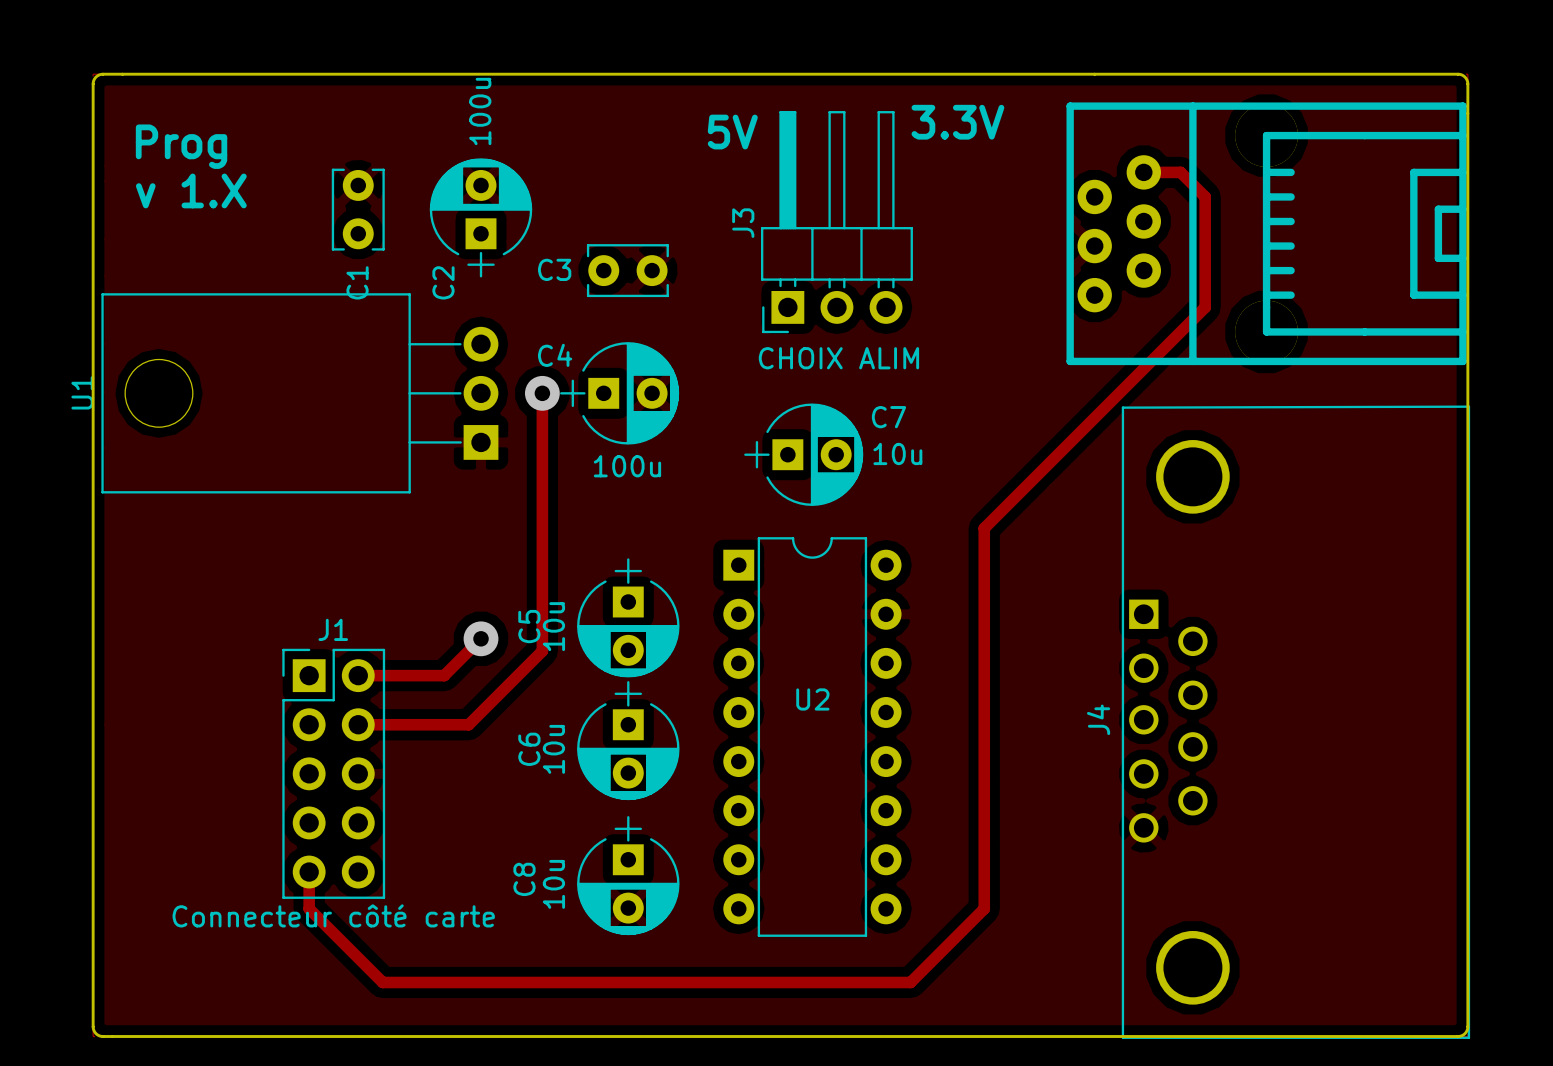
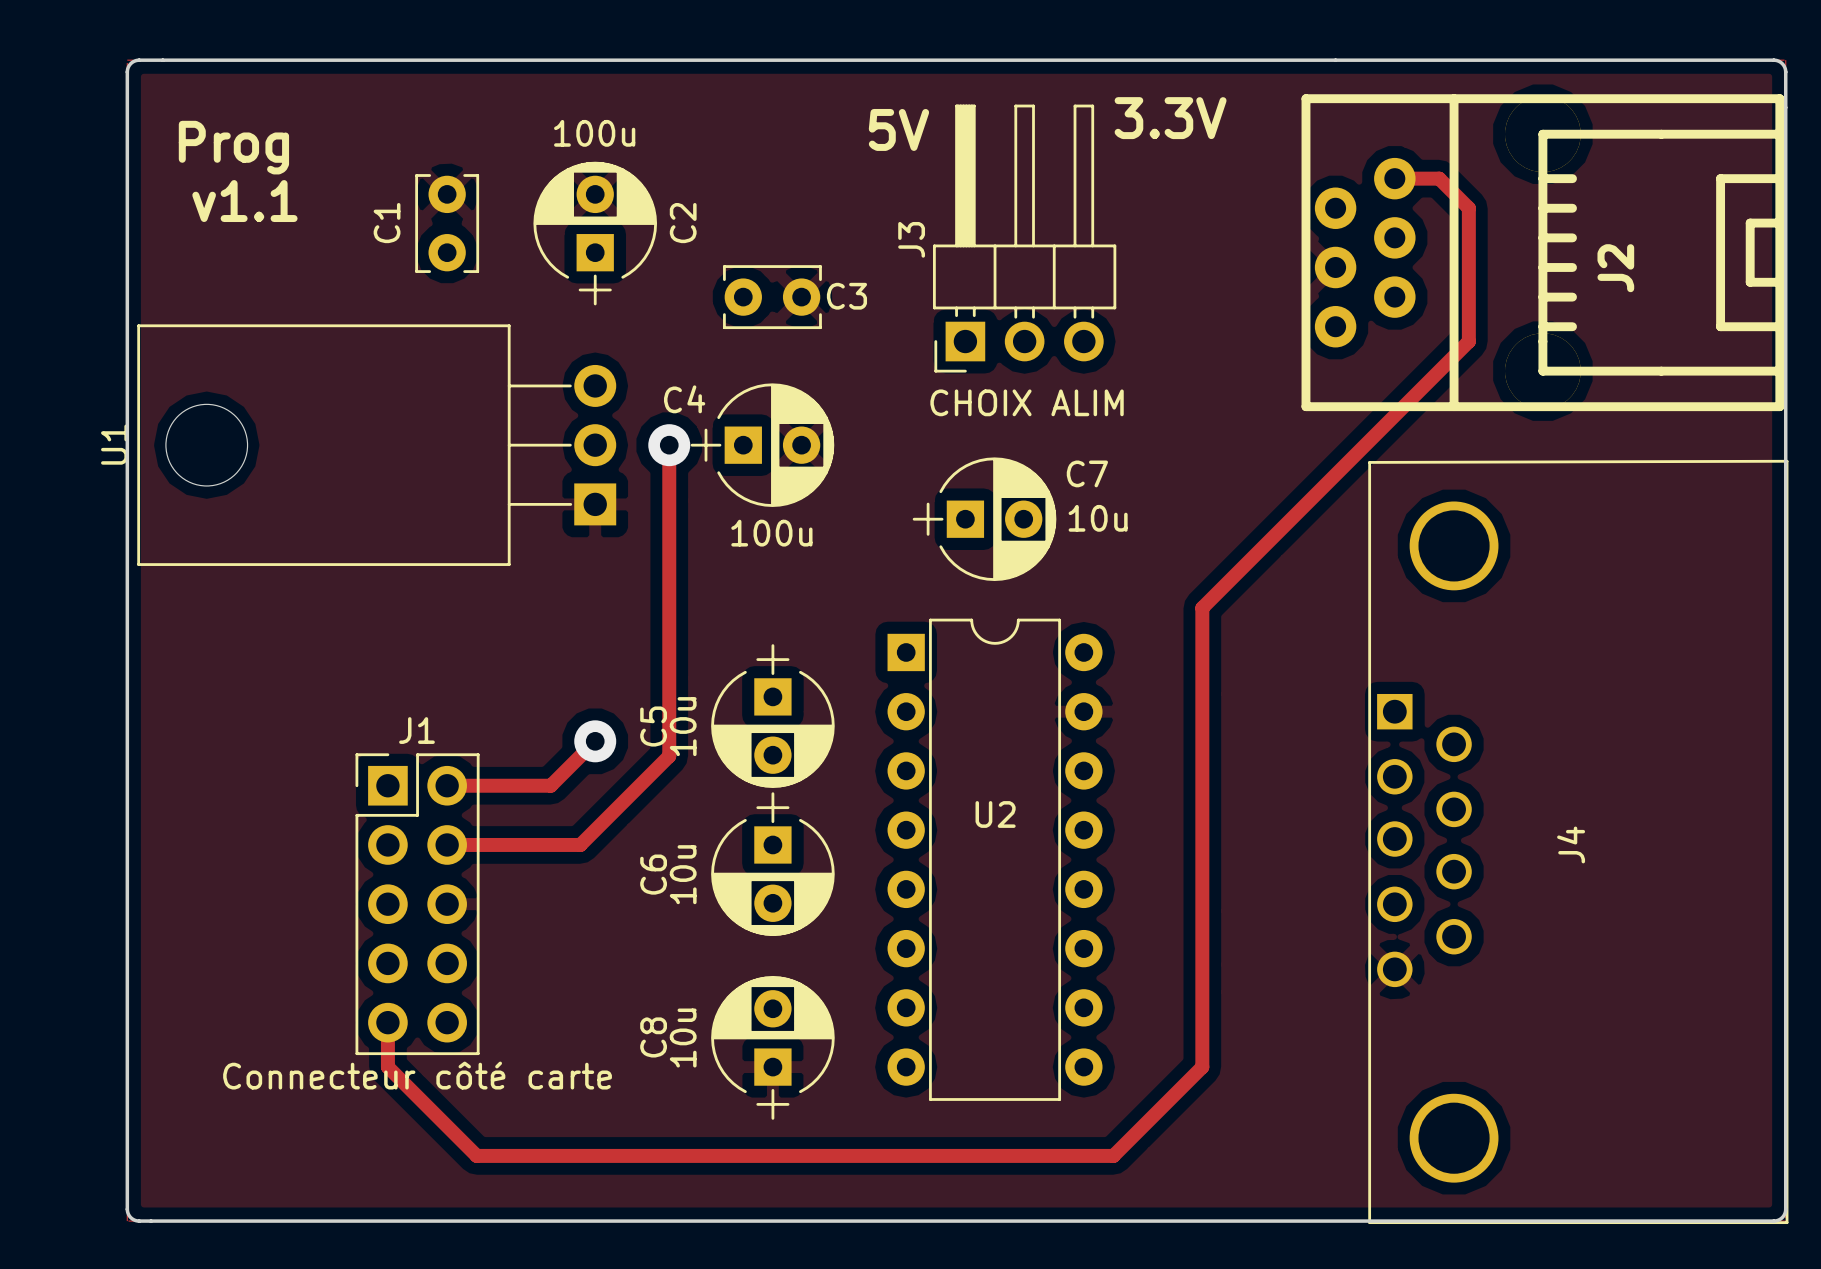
C2 value rotation: 0° (480, 111) -> 90° clockwise (594, 133)
text: v 1.X (191, 190) -> v1.1 (244, 201)
J2 name: none -> J2 (1615, 268)
C3 name position: C3 (554, 269) -> C3 (846, 296)
C1 name position: C1 (357, 282) -> C1 (387, 223)
C2 name position: C2 (443, 282) -> C2 (683, 223)
J4 name position: J4 (1098, 719) -> J4 (1571, 844)
C8 rotation: 0° (628, 875) -> 180° (772, 1047)

